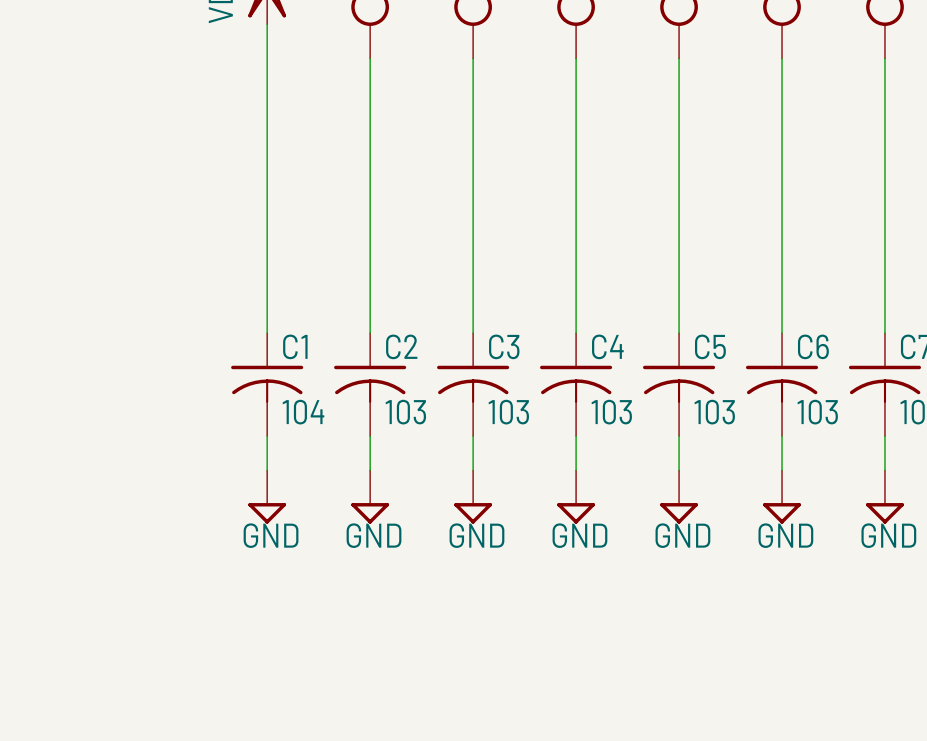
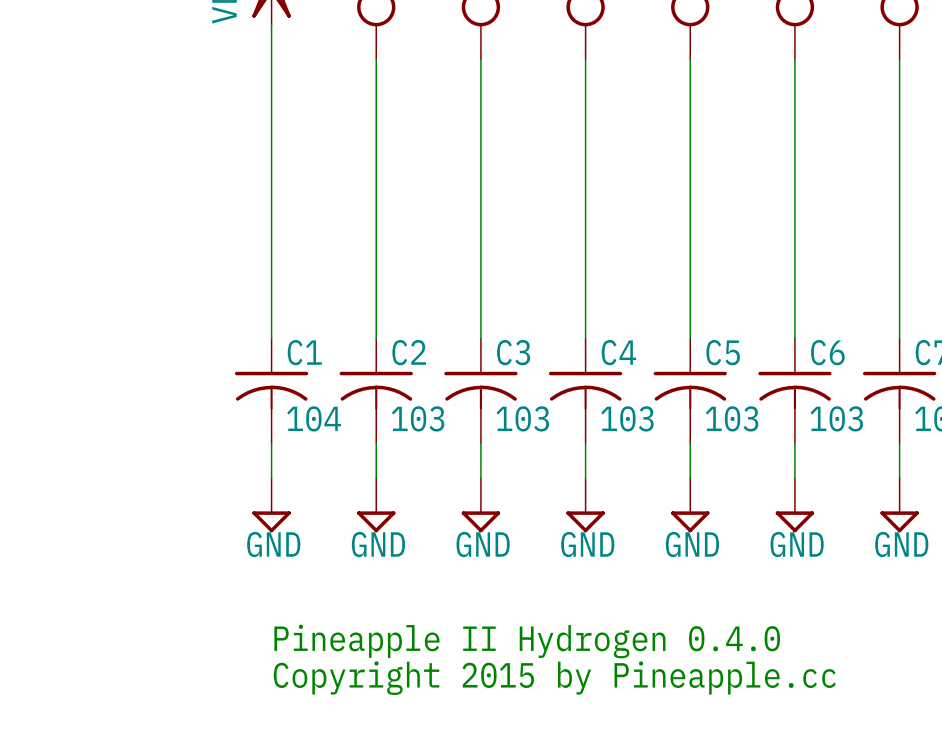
text: none -> Pineapple II Hydrogen 0.4.0 (527, 641)
text: none -> Copyright 2015 by Pineapple.cc (554, 678)

